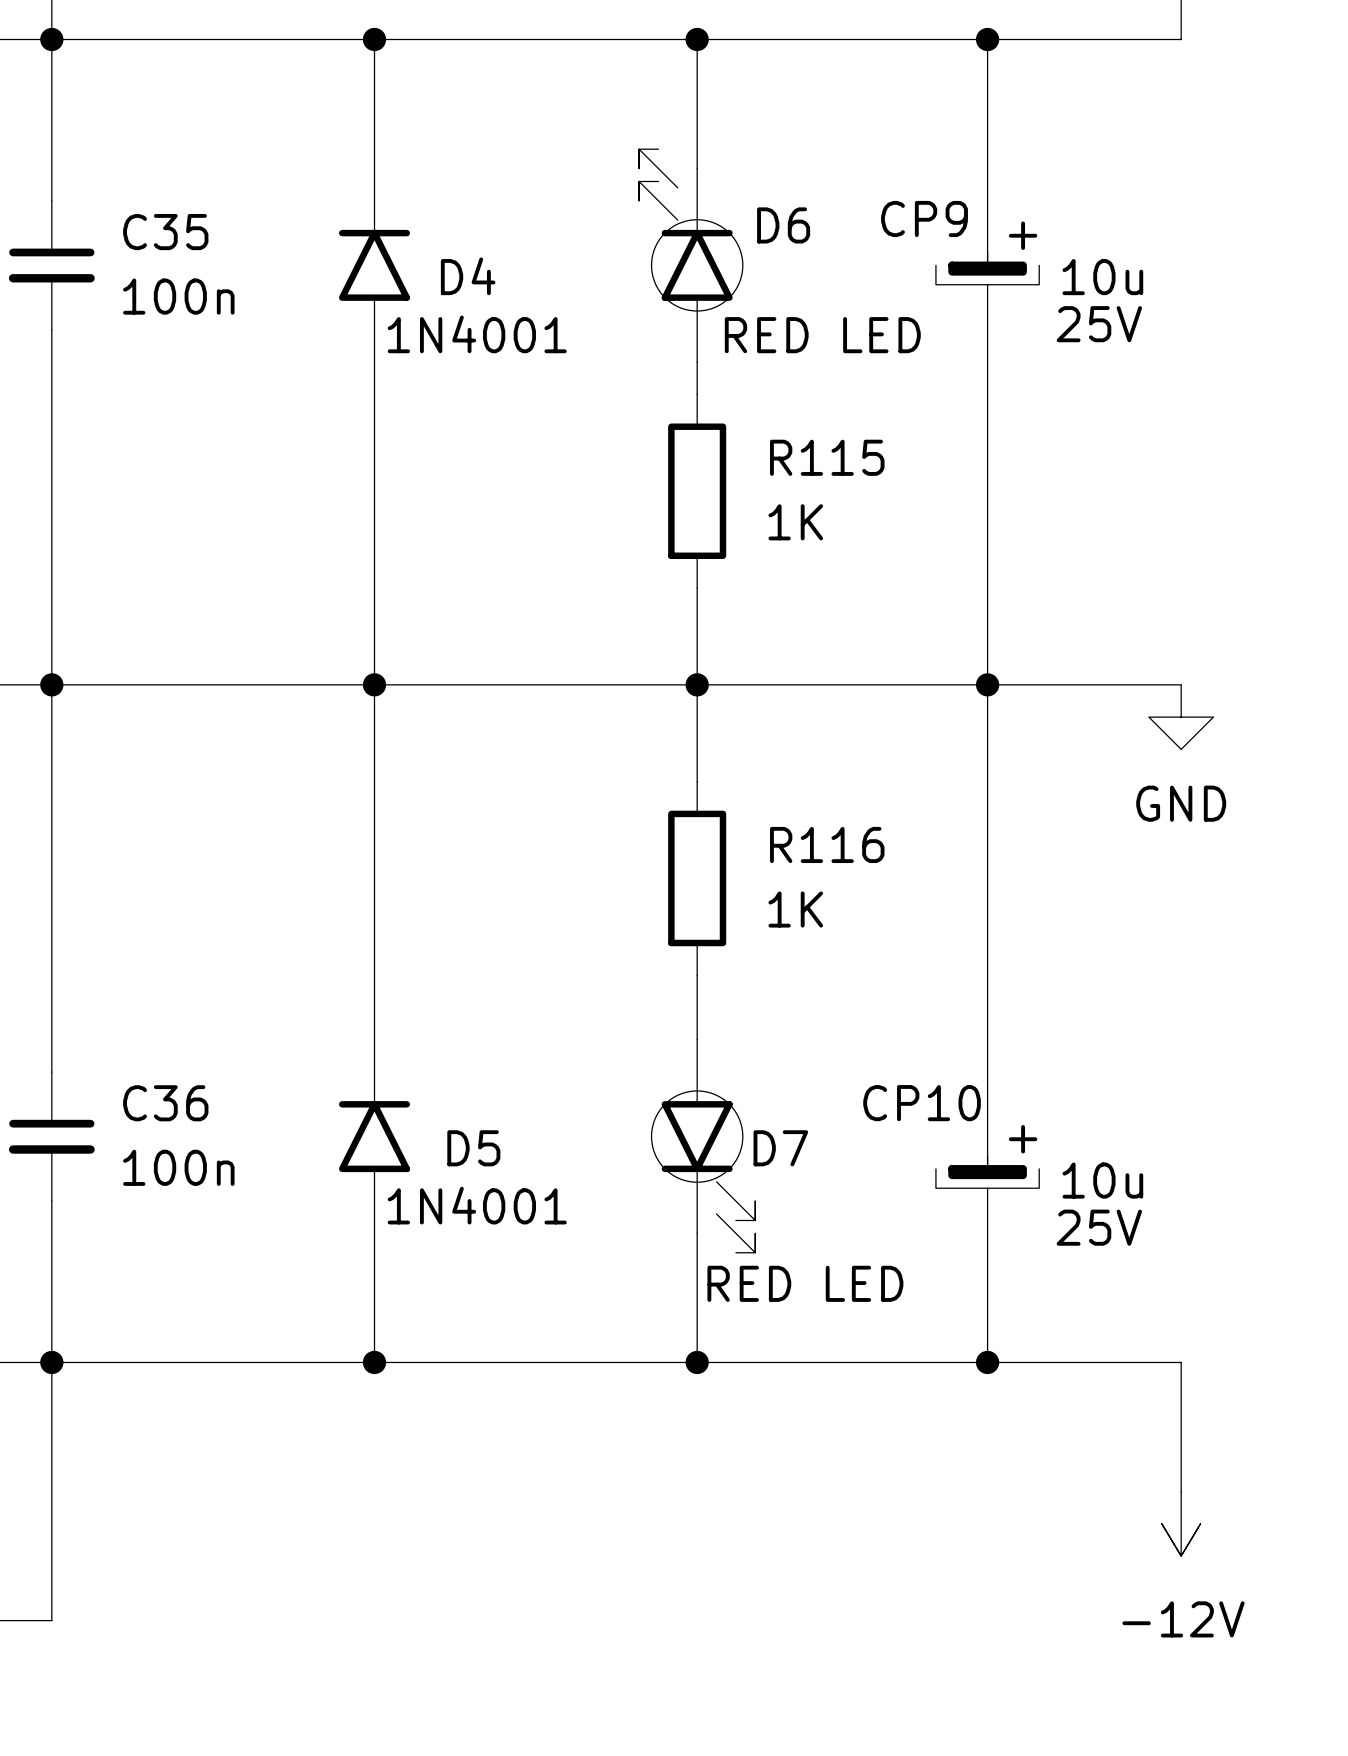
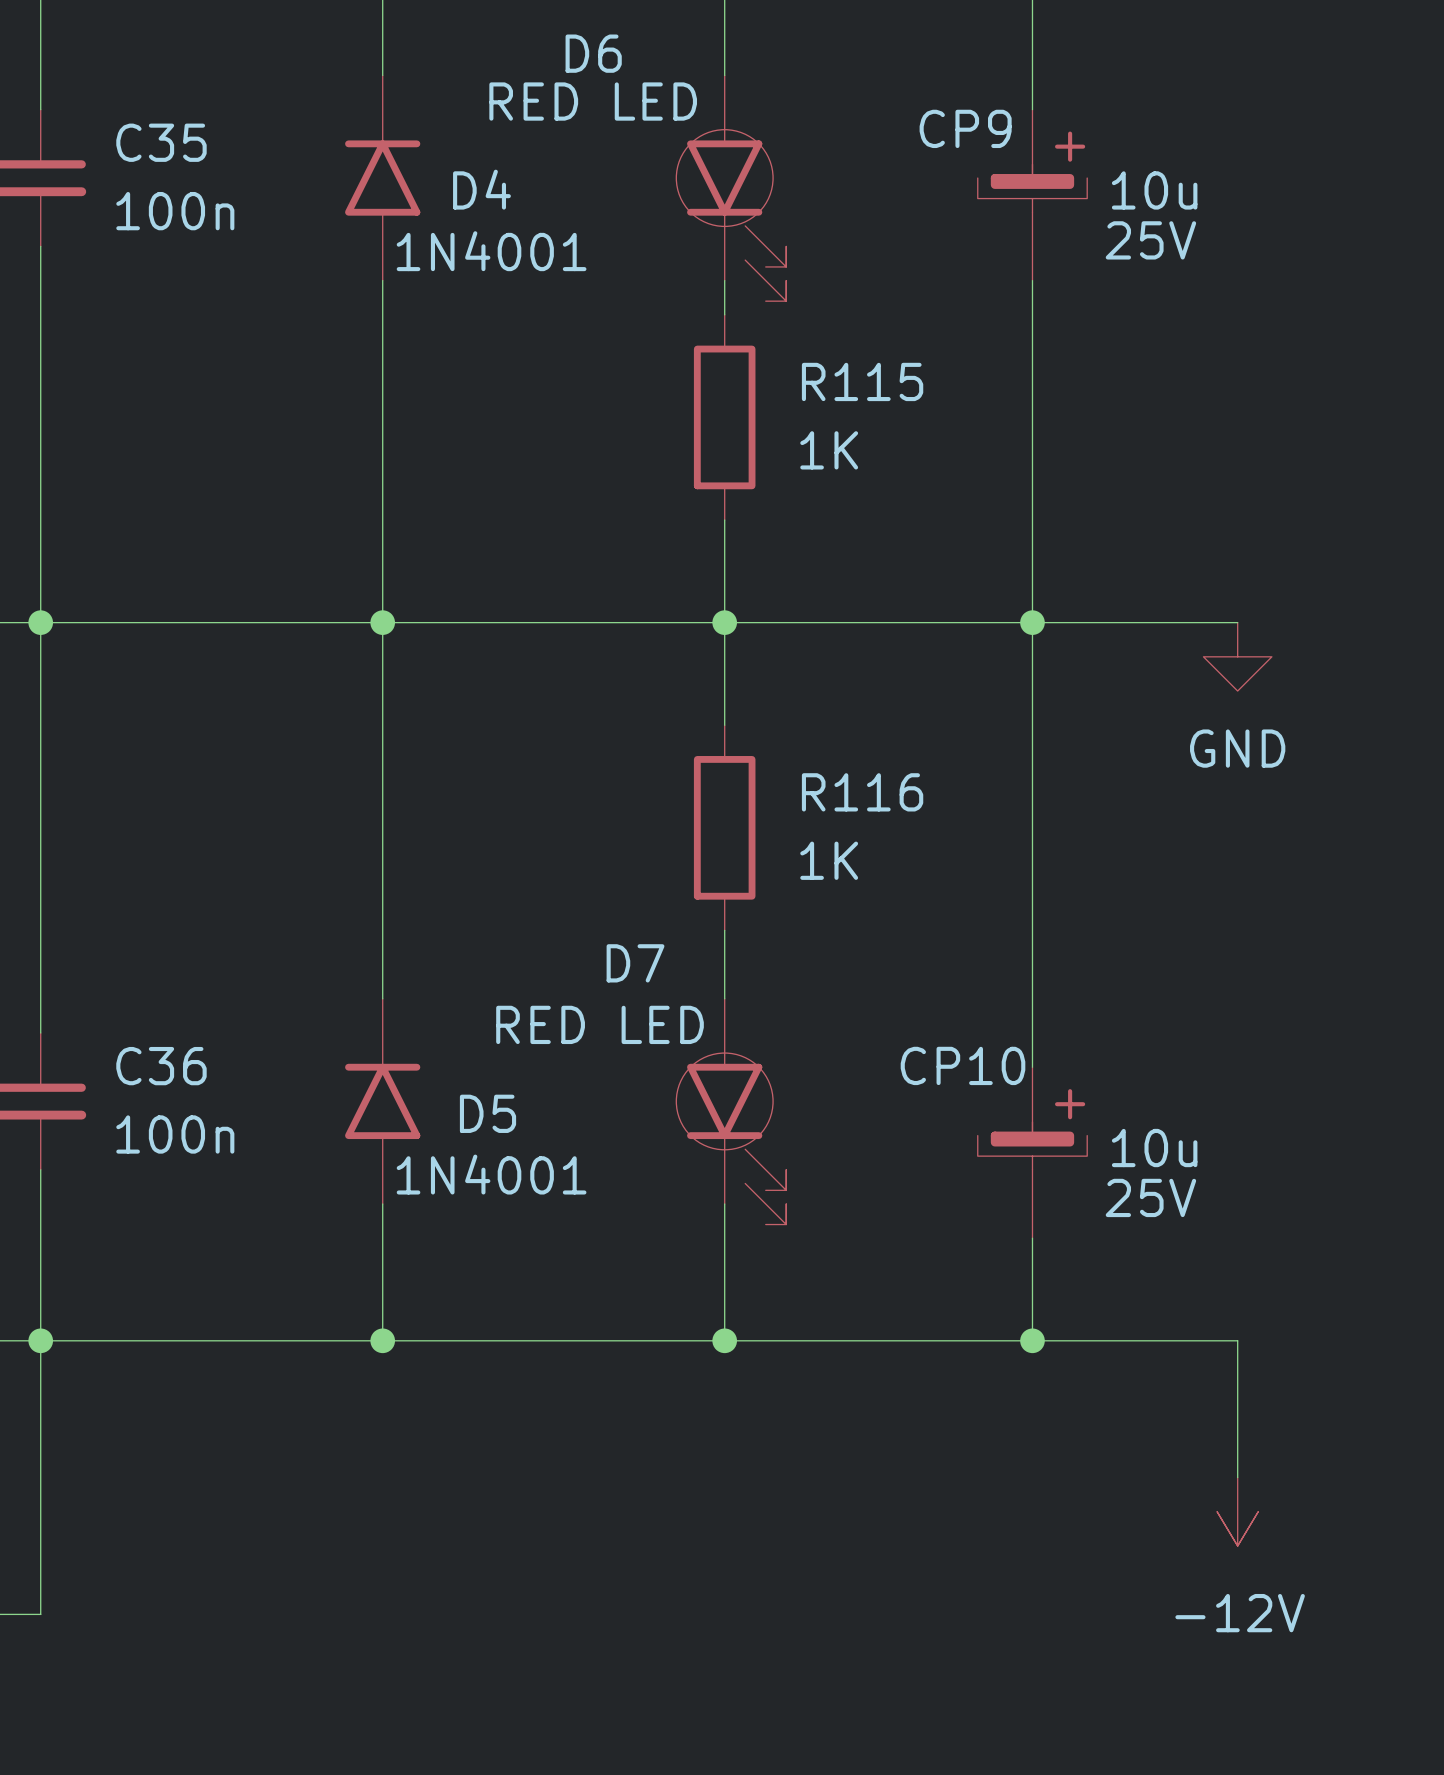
D6 name position: D6 (783, 225) -> D6 (593, 53)
D6 rotation: 0° (716, 230) -> 180° (704, 215)
D7 name position: D7 (780, 1148) -> D7 (635, 963)
D7 value position: RED LED (805, 1283) -> RED LED (600, 1024)

